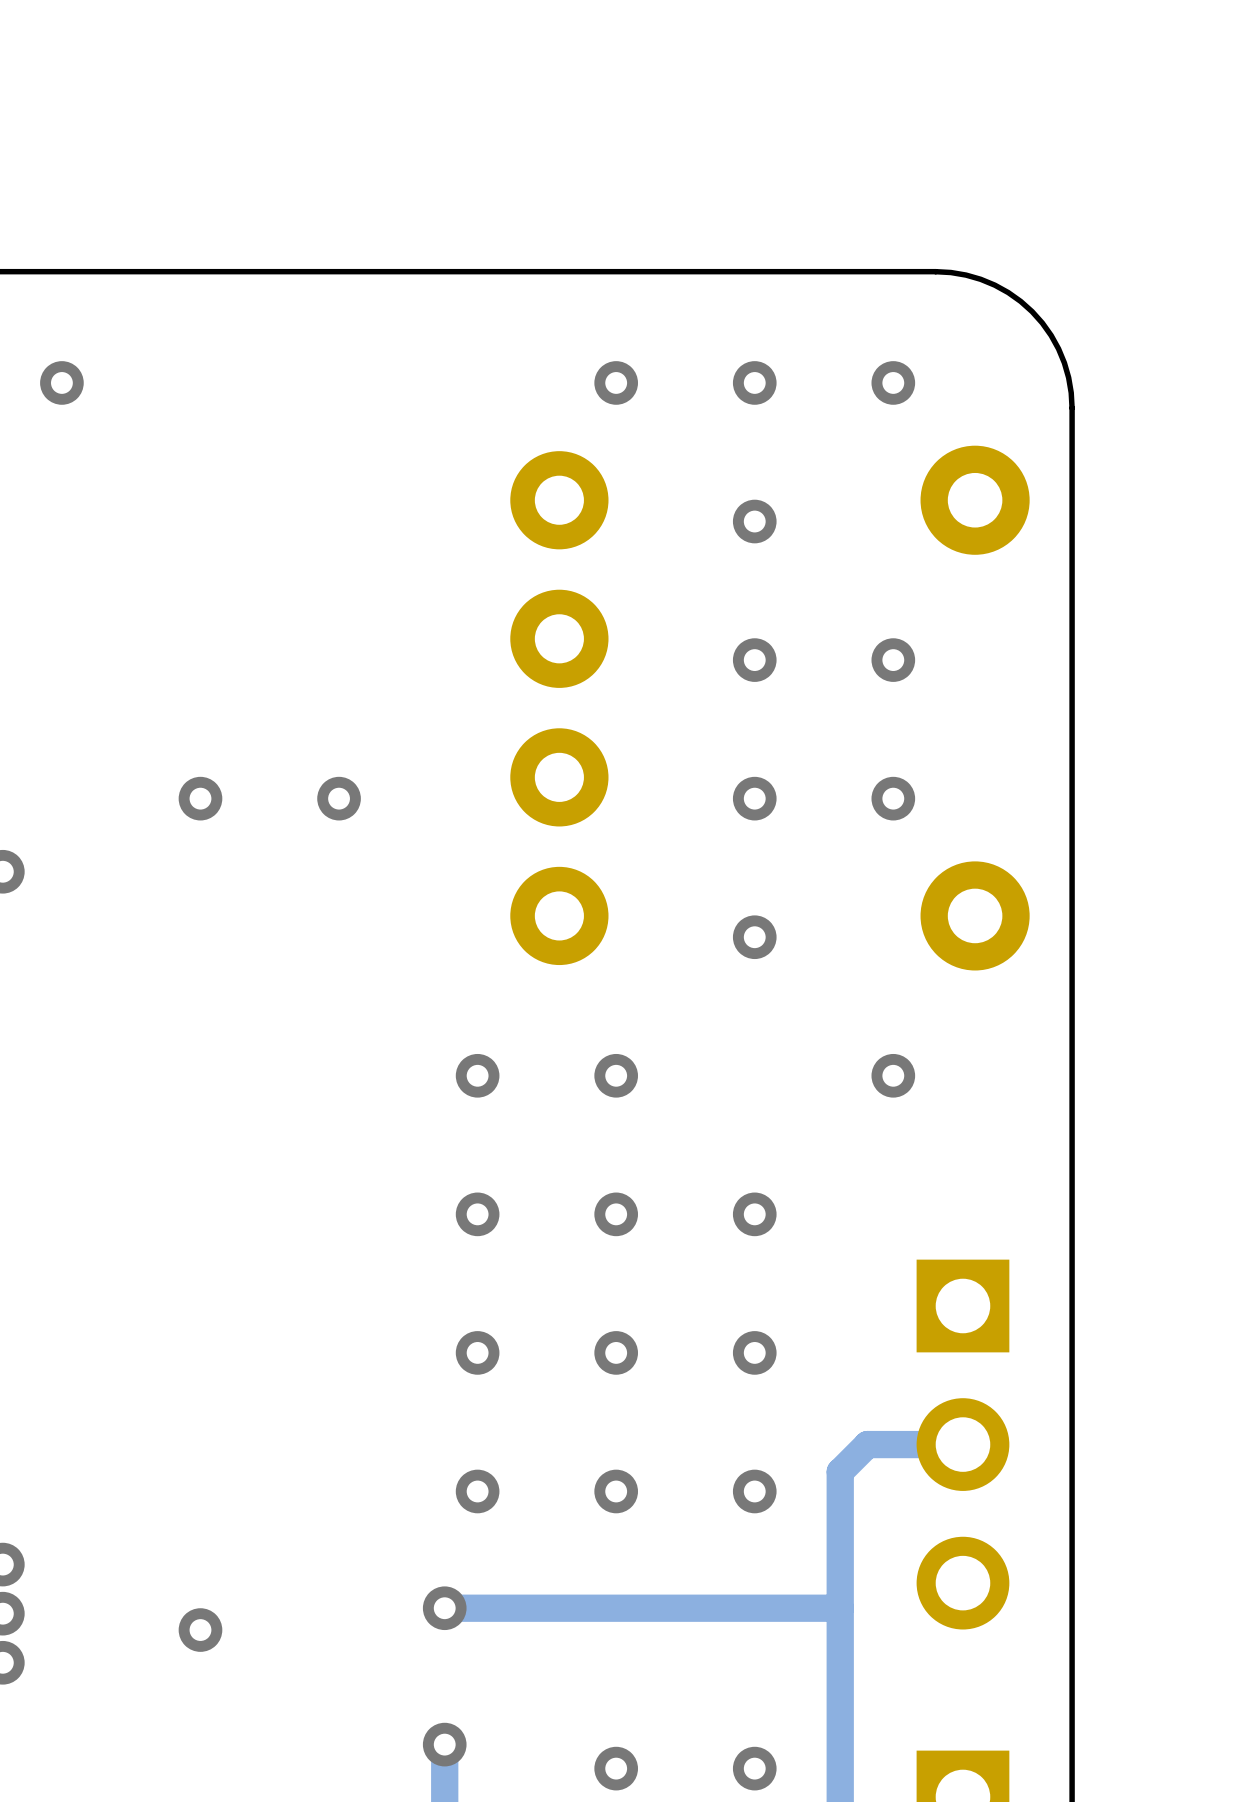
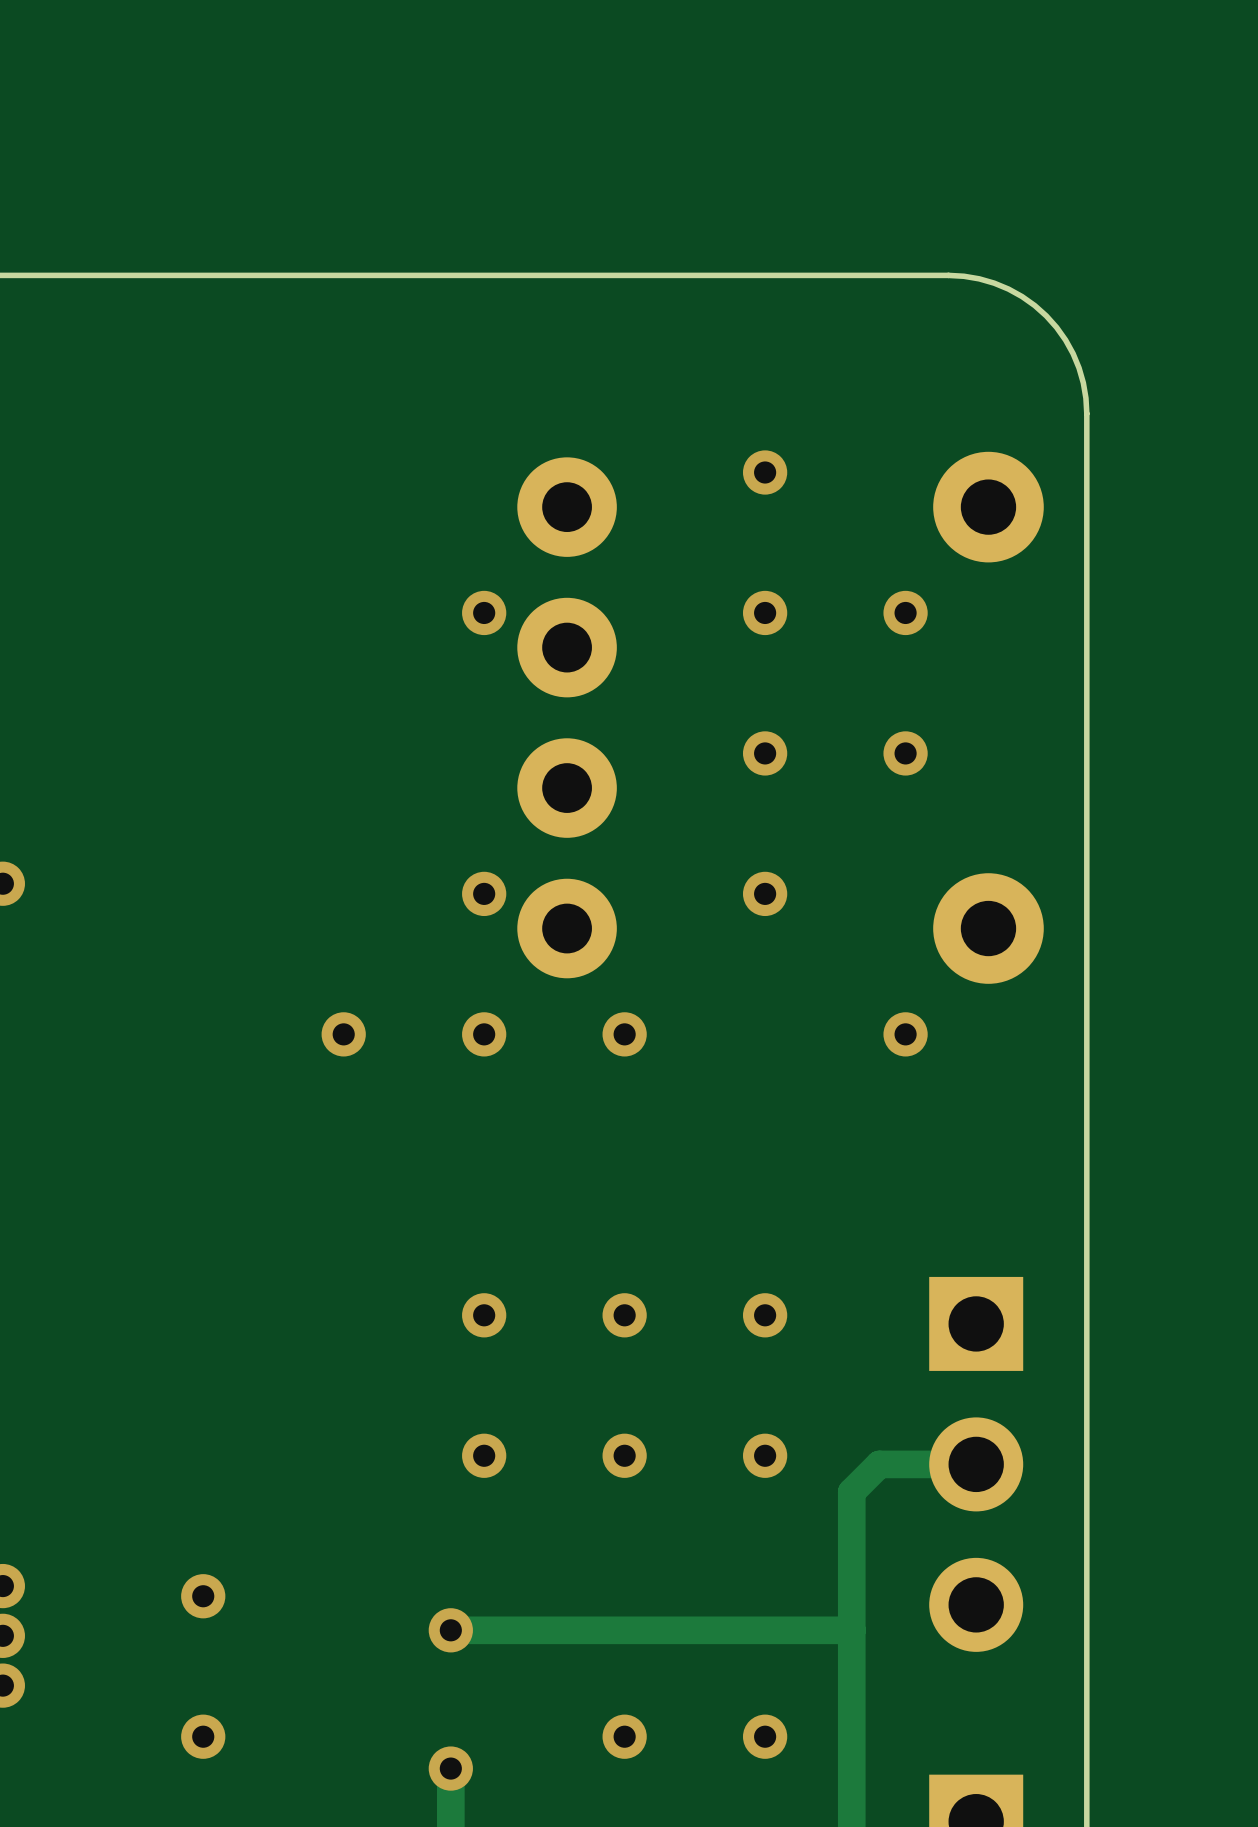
via: (61, 382) -> none
via: (616, 382) -> none
via: (754, 382) -> none
via: (893, 382) -> none
via: none -> (765, 472)
via: (754, 521) -> none
via: none -> (484, 612)
via: none -> (765, 612)
via: none -> (905, 612)
via: (754, 660) -> none
via: (893, 660) -> none
via: none -> (765, 753)
via: none -> (905, 753)
via: (200, 798) -> none
via: (339, 798) -> none
via: (754, 798) -> none
via: (893, 798) -> none
via: none -> (484, 893)
via: none -> (765, 893)
via: (754, 937) -> none
via: none -> (343, 1034)
via position: (477, 1075) -> (484, 1034)
via position: (616, 1075) -> (624, 1034)
via position: (893, 1075) -> (905, 1034)
via: (477, 1214) -> none
via: (616, 1214) -> none
via: (754, 1214) -> none
via: none -> (484, 1315)
via: none -> (624, 1315)
via: none -> (765, 1315)
via: (477, 1352) -> none
via: (616, 1352) -> none
via: (754, 1352) -> none
via: none -> (484, 1455)
via: none -> (624, 1455)
via: none -> (765, 1455)
via: (477, 1491) -> none
via: (616, 1491) -> none
via: (754, 1491) -> none
via: none -> (203, 1596)
via: (200, 1630) -> none
via: none -> (203, 1736)
via: none -> (624, 1736)
via: none -> (765, 1736)
via: (616, 1768) -> none
via: (754, 1768) -> none

